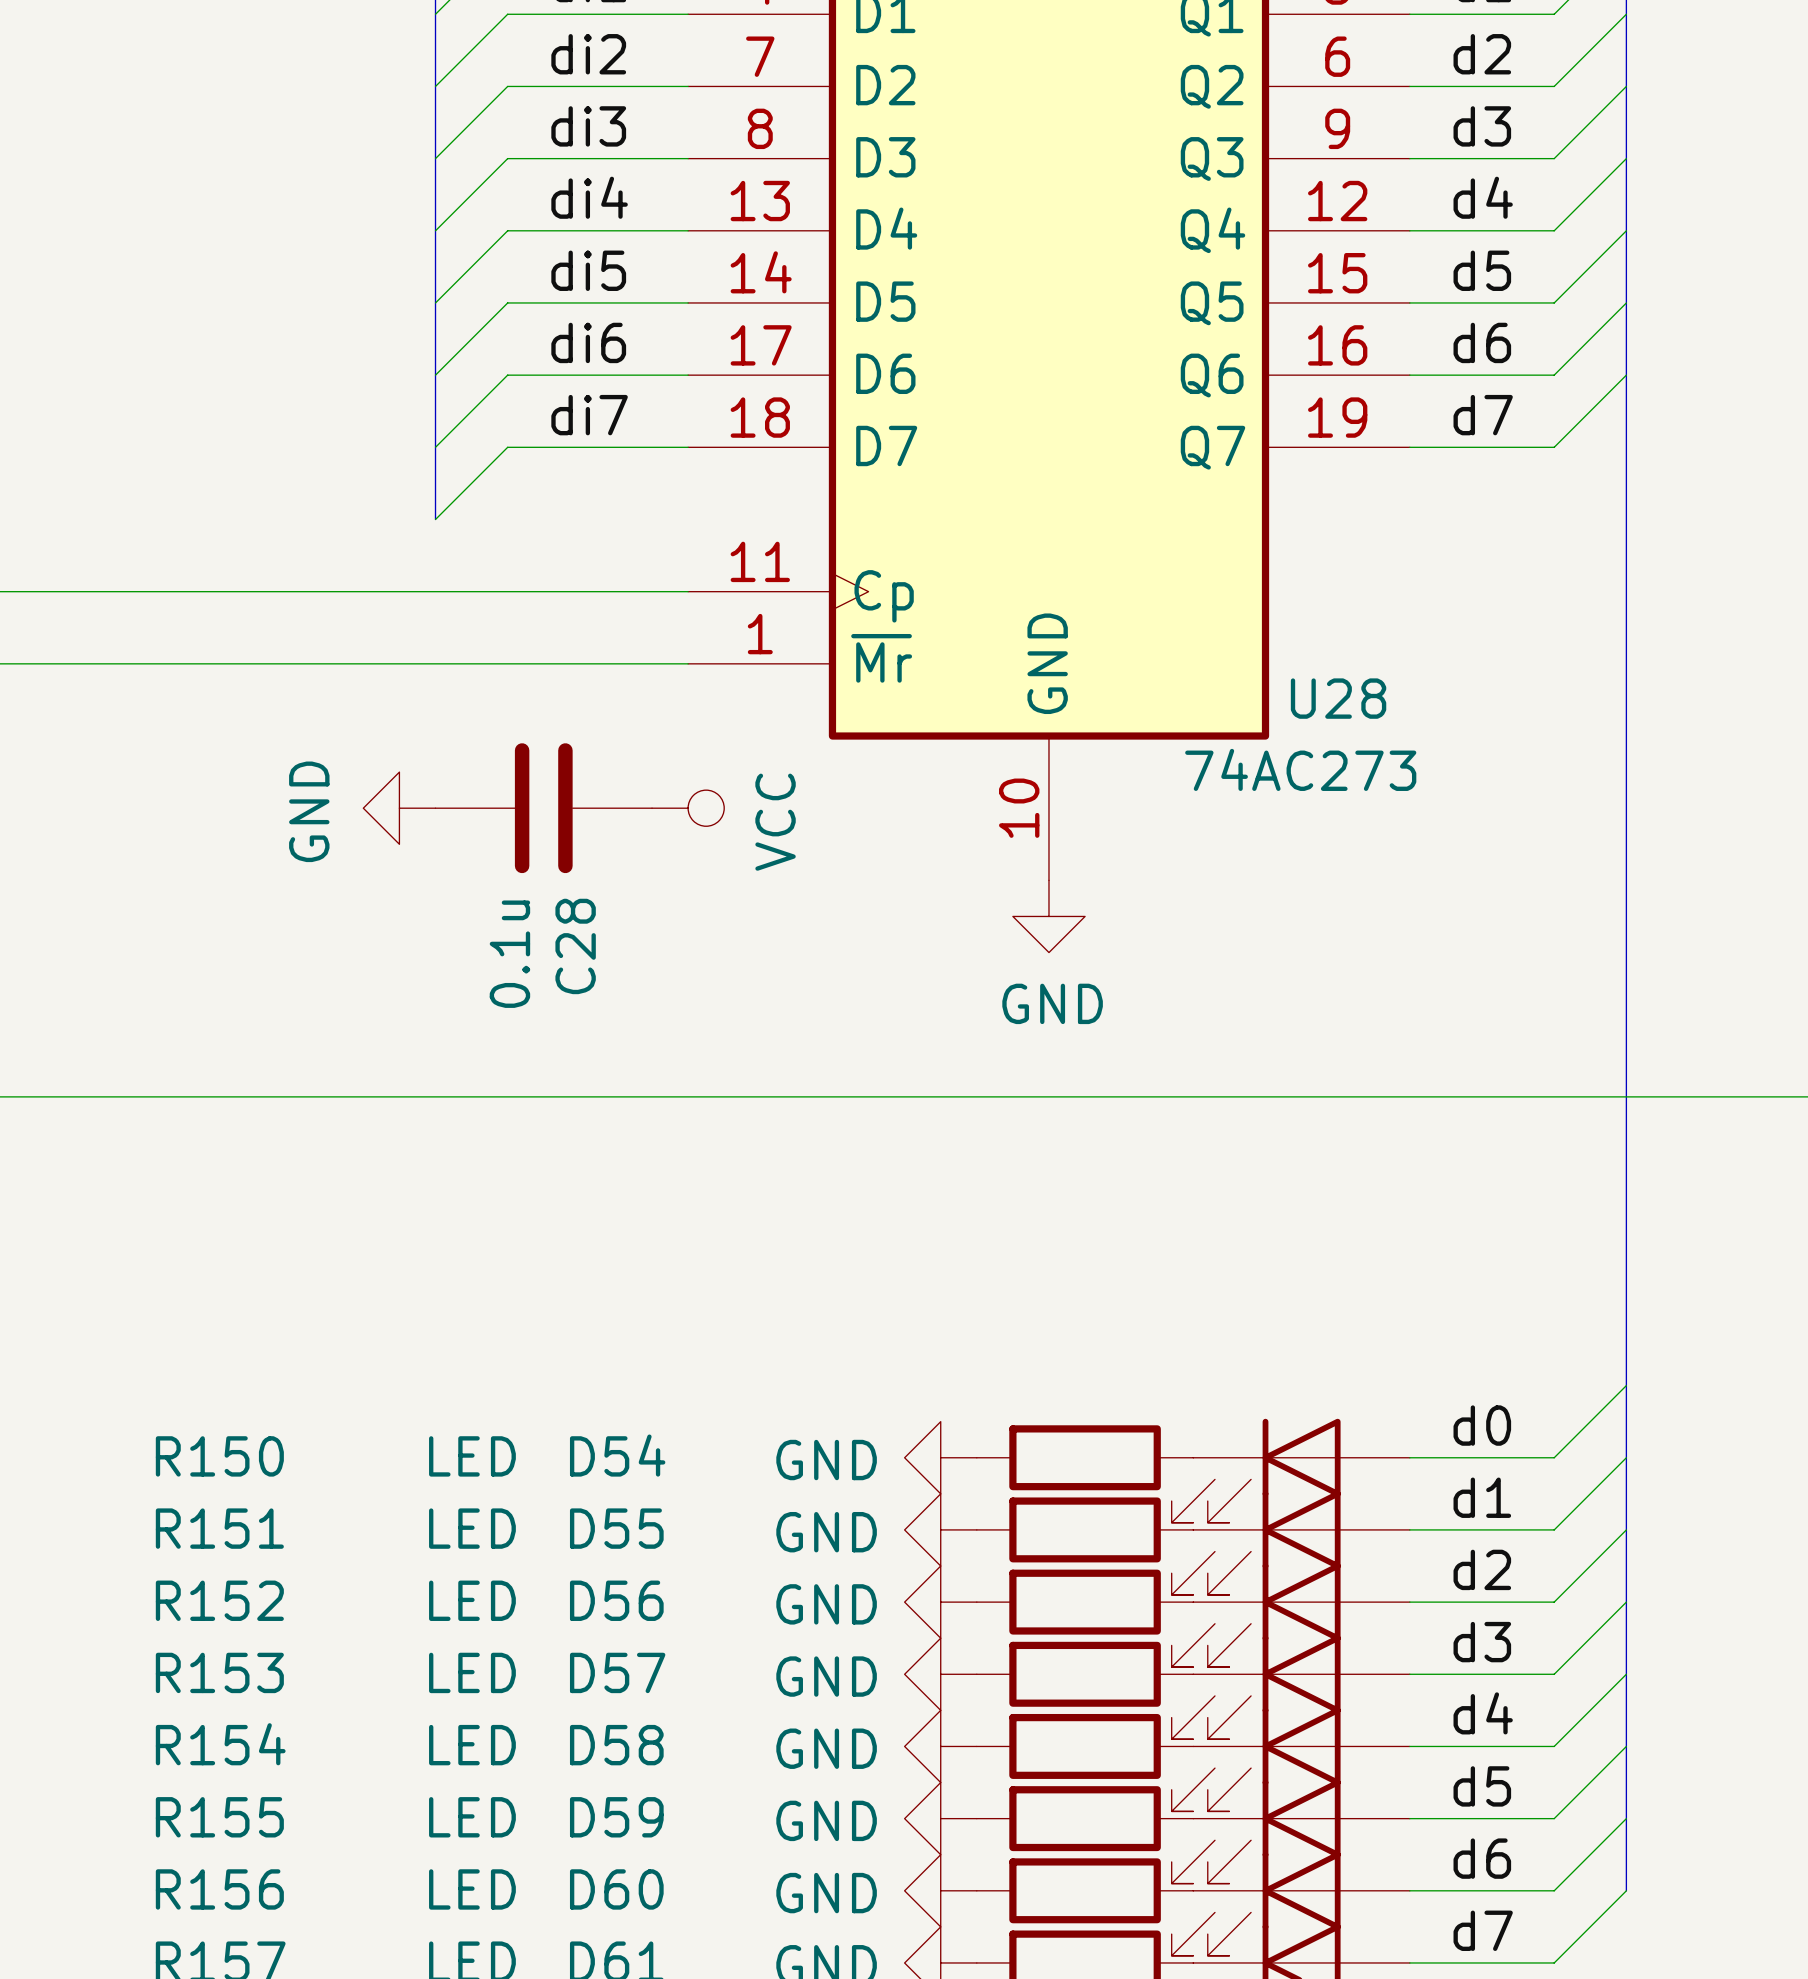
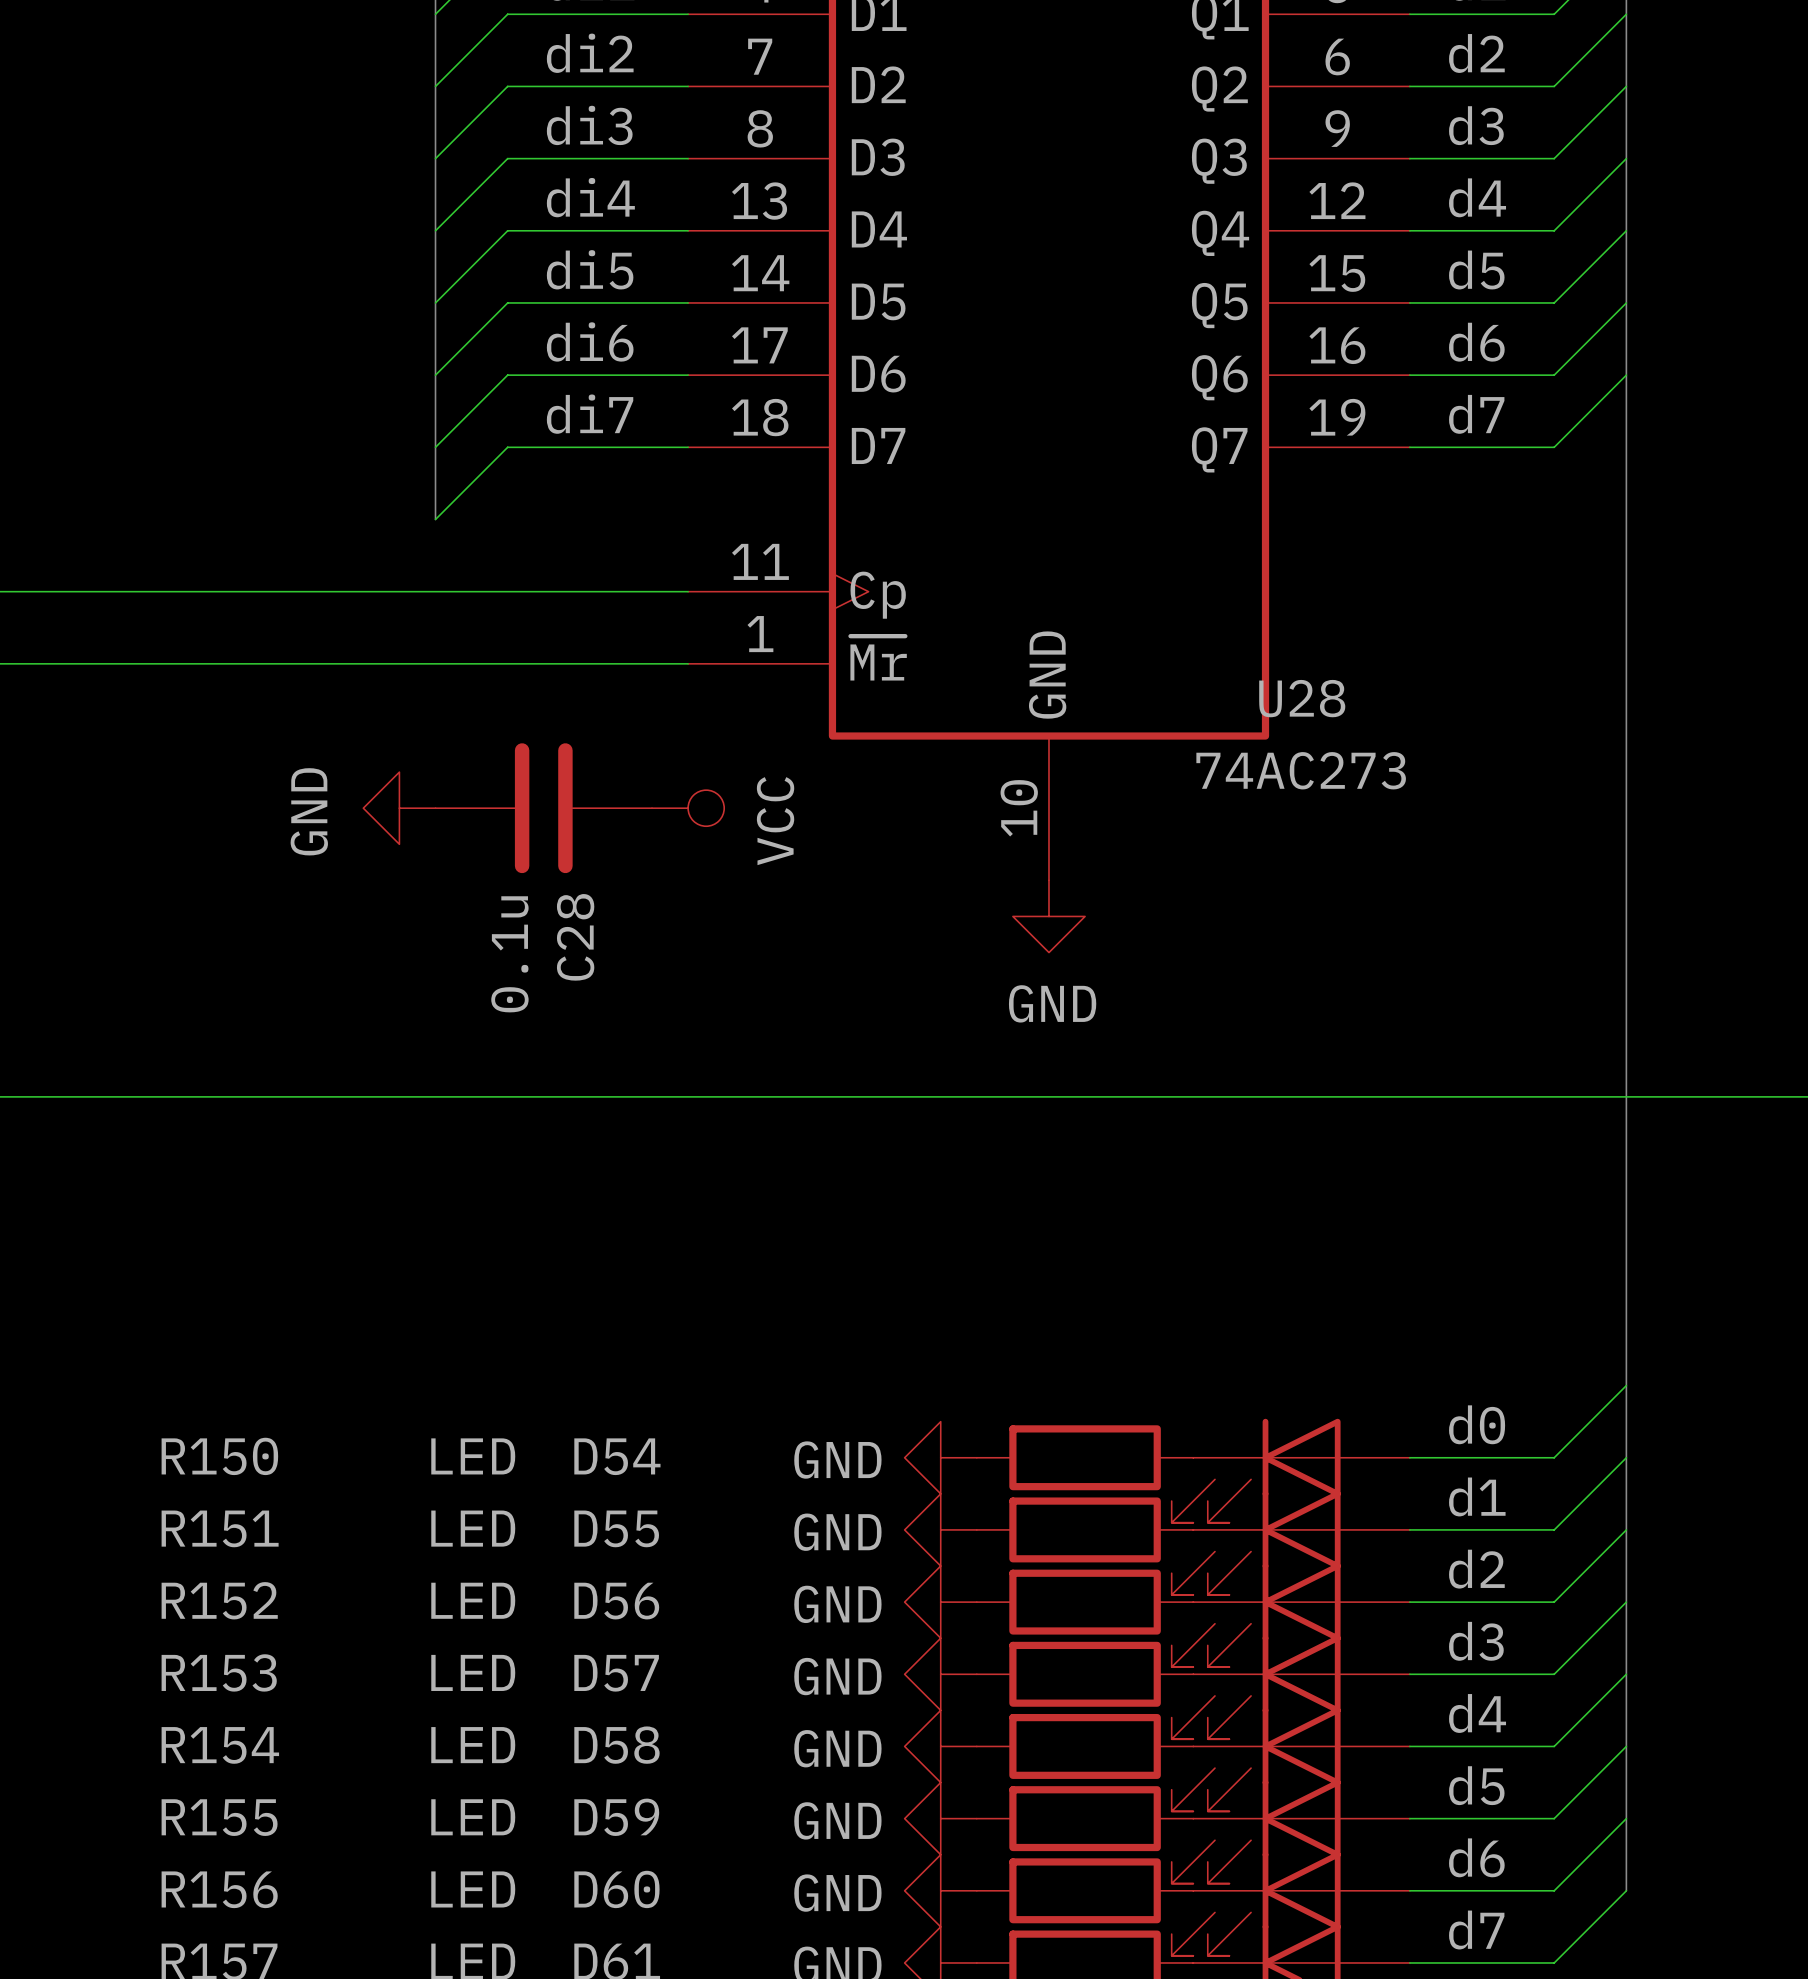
U28 name position: U28 (1338, 698) -> U28 (1302, 698)

